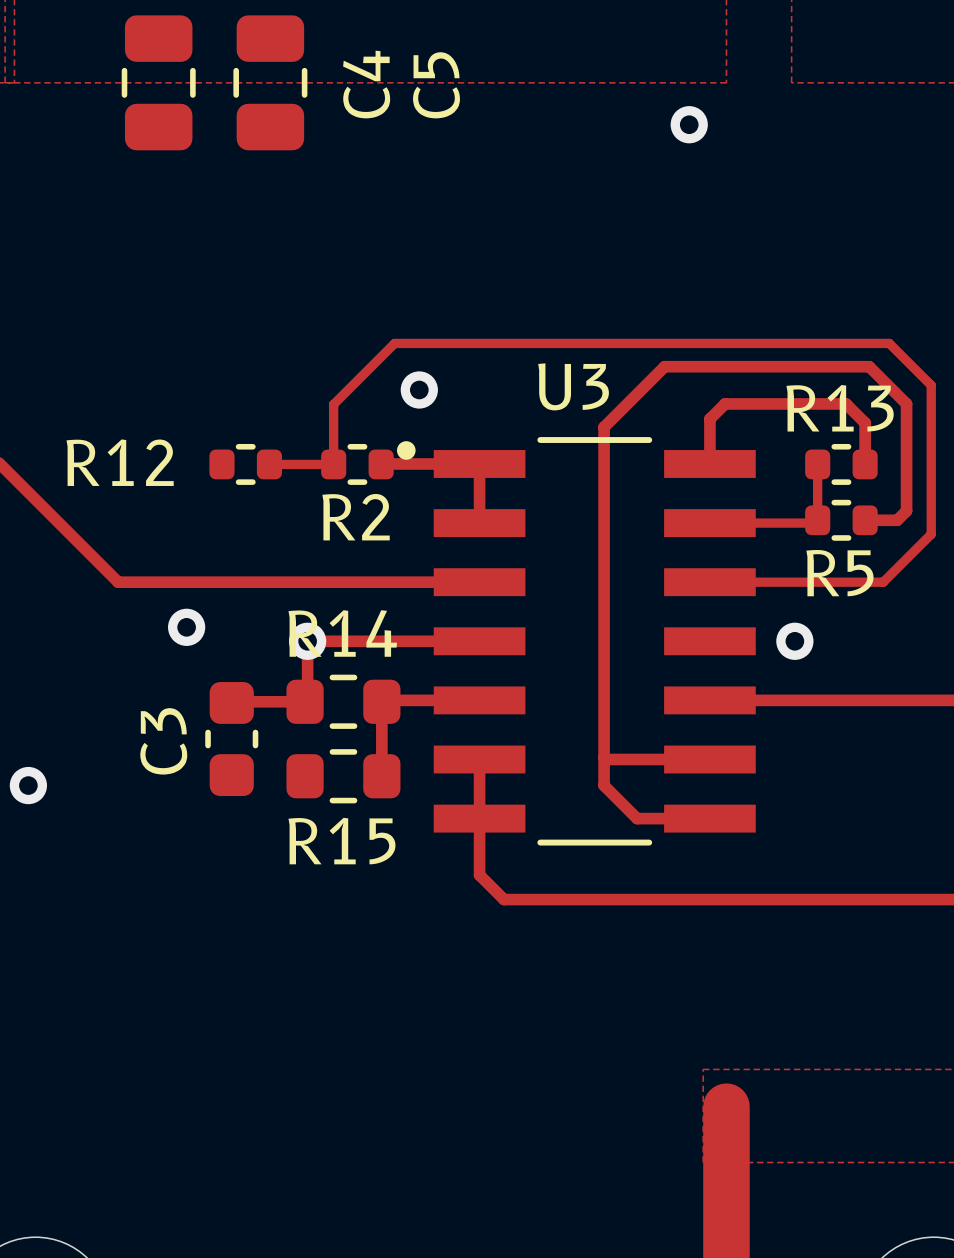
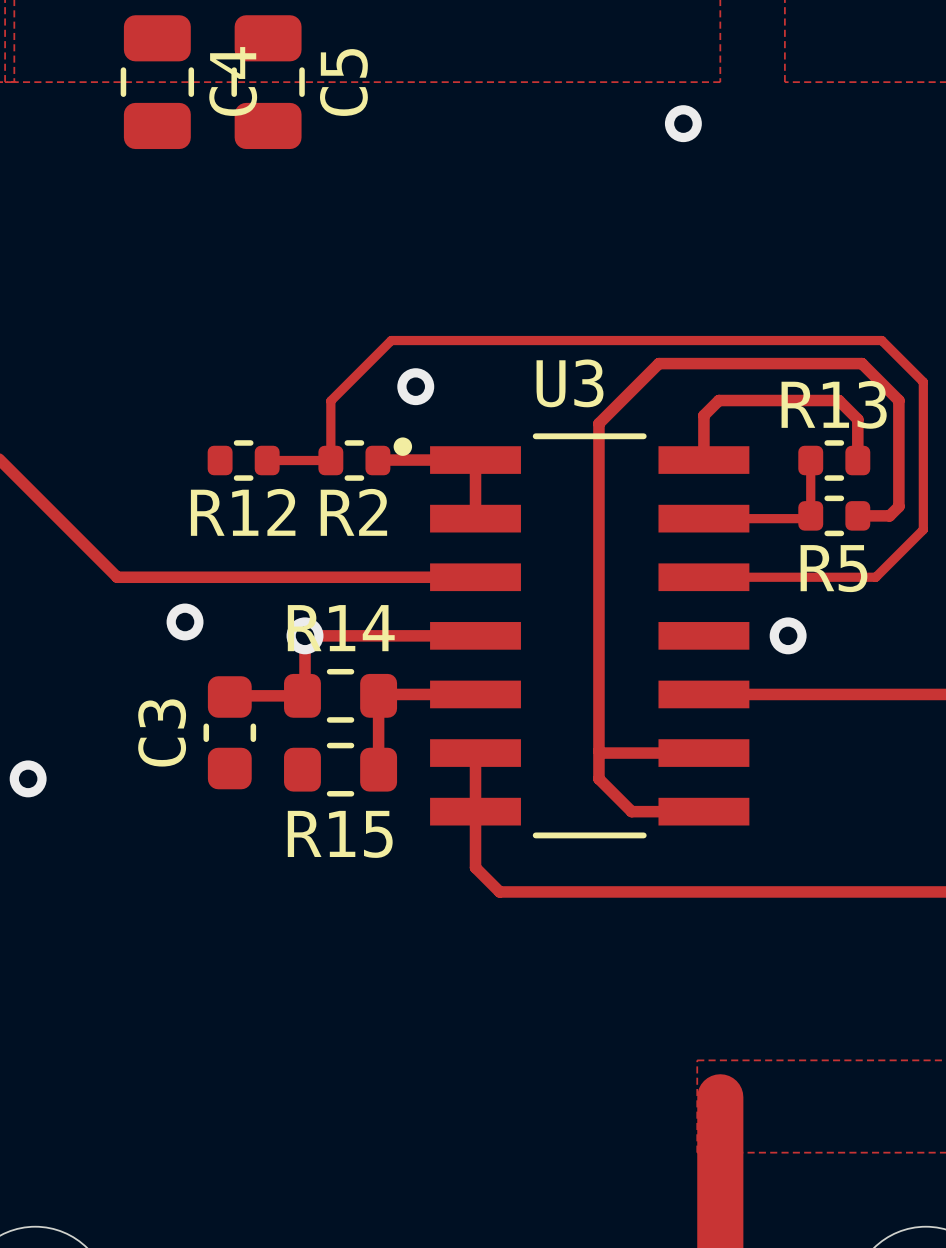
C4 name position: C4 (366, 84) -> C4 (233, 81)
C5 name position: C5 (436, 85) -> C5 (343, 82)
R12 name position: R12 (120, 462) -> R12 (243, 512)

